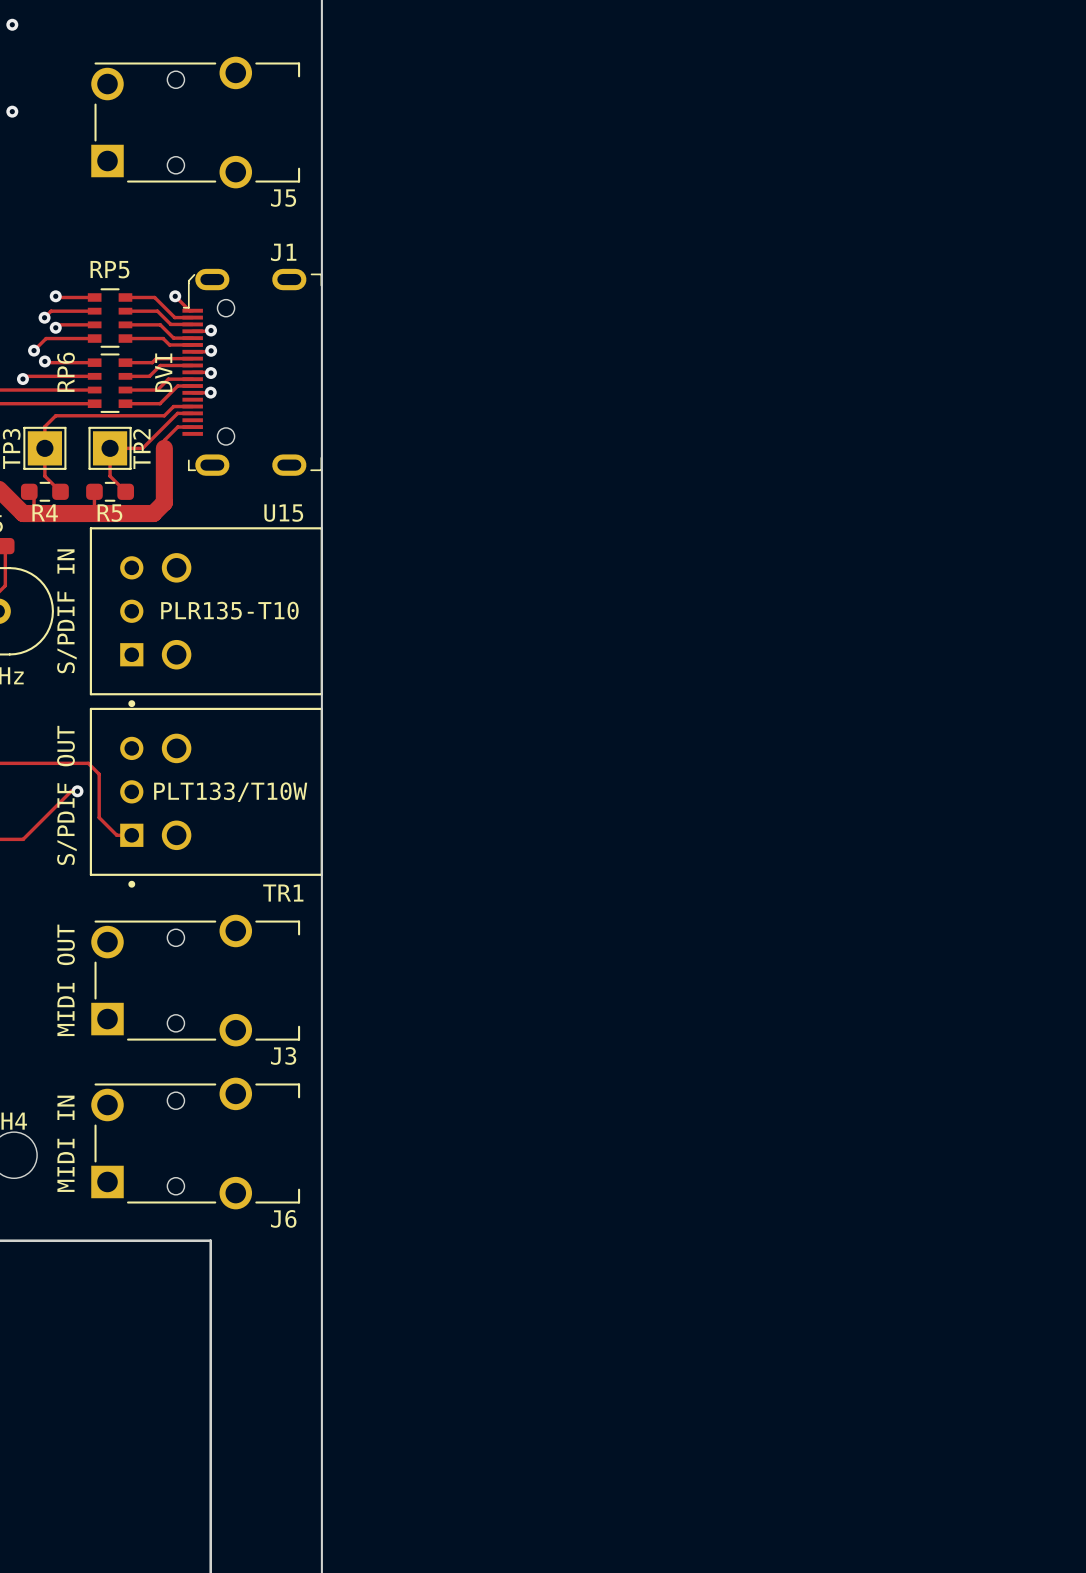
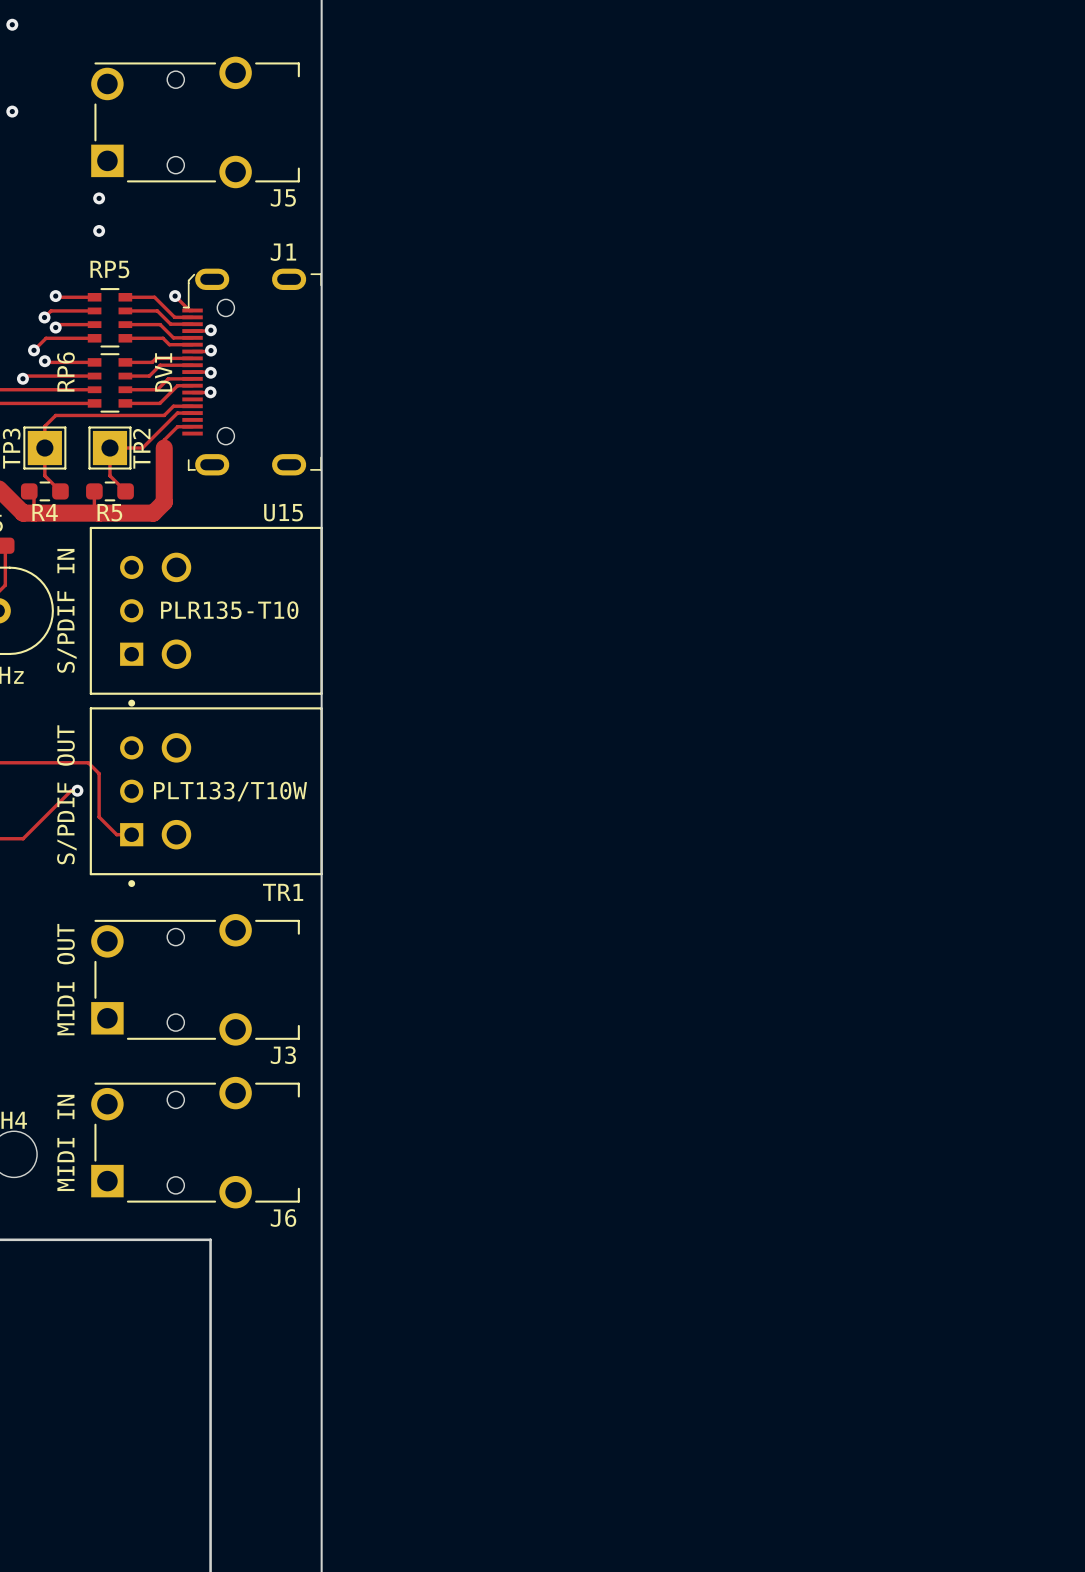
via: none -> (99, 198)
via: none -> (99, 230)

